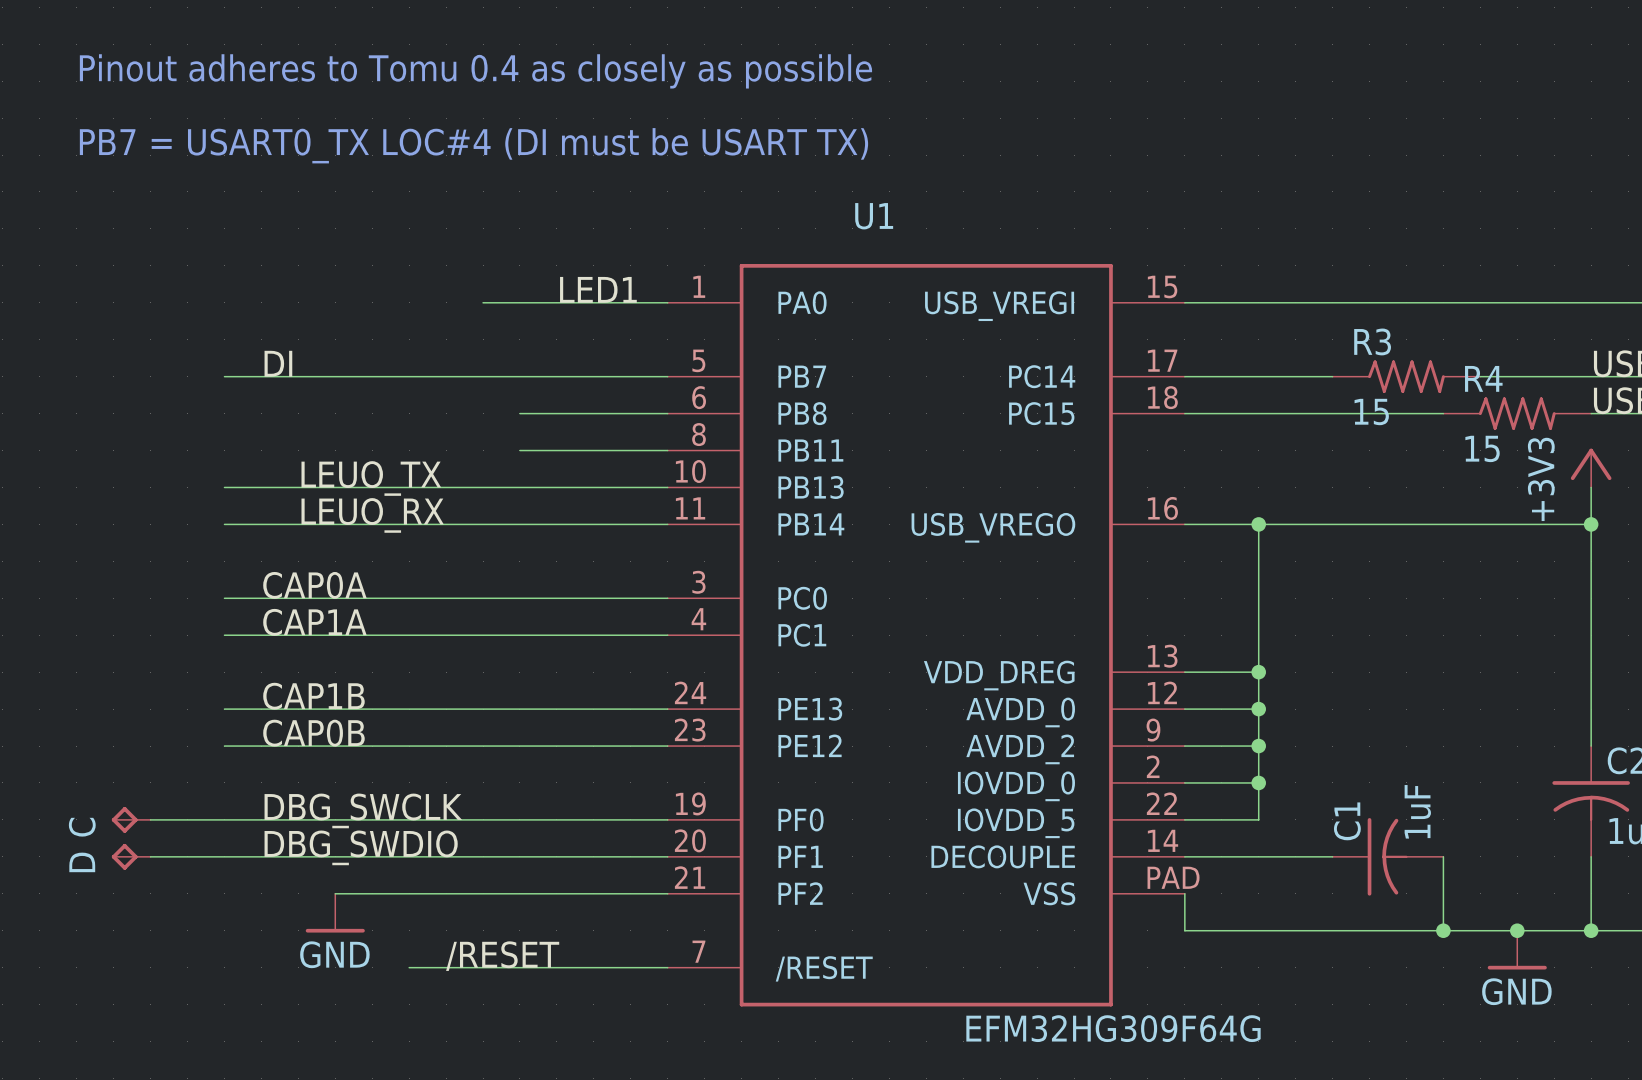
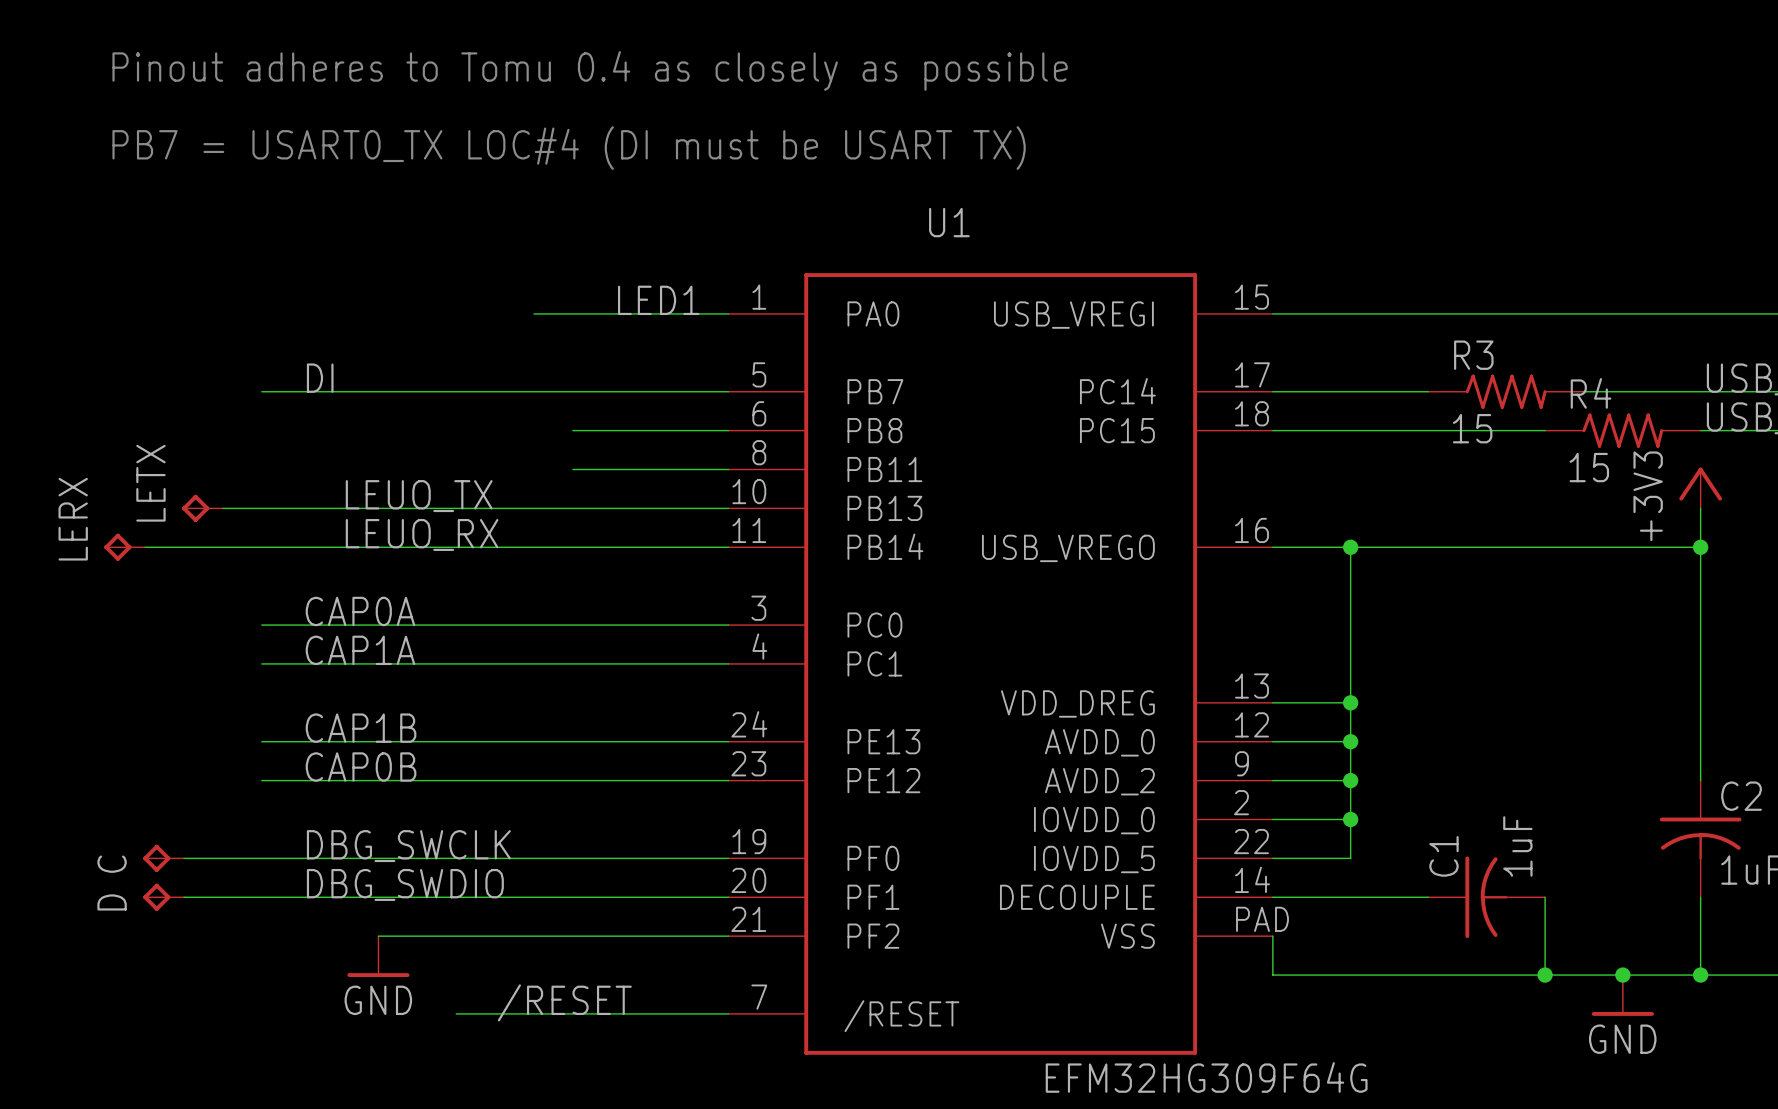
LETX: none -> (202, 508)
wire: none -> (222, 508) (261, 508)
LERX: none -> (124, 547)
wire: none -> (145, 547) (261, 547)

